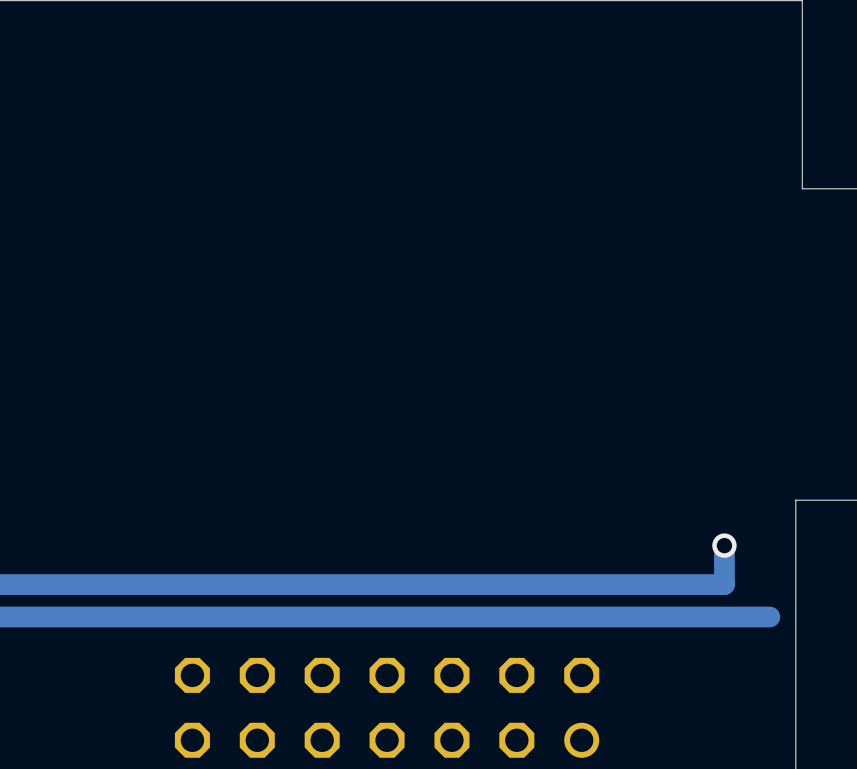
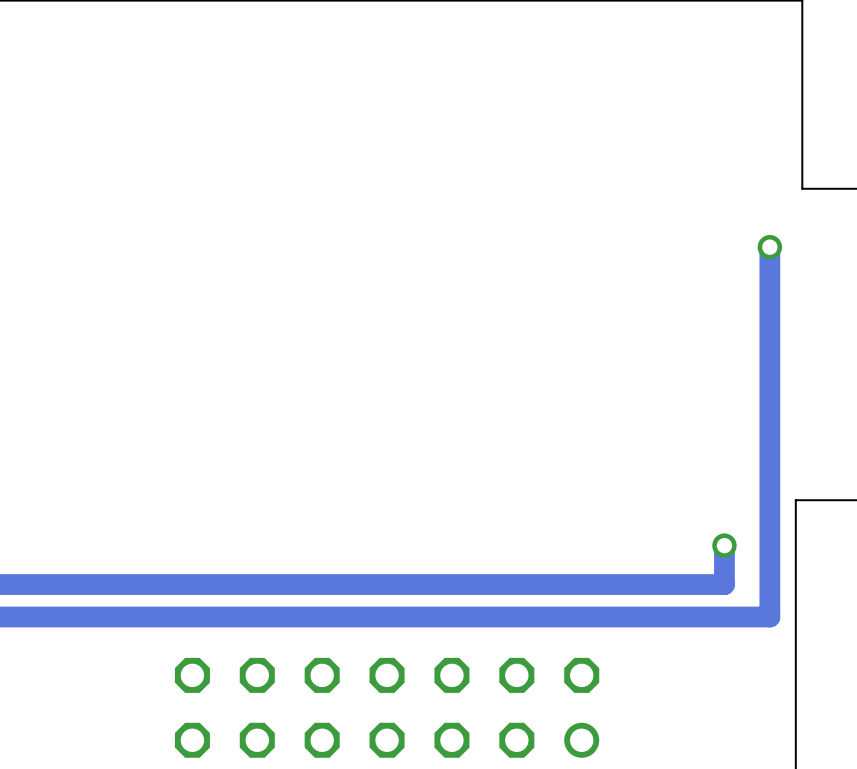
track: none -> (769, 247) (769, 617)
via: none -> (769, 247)

